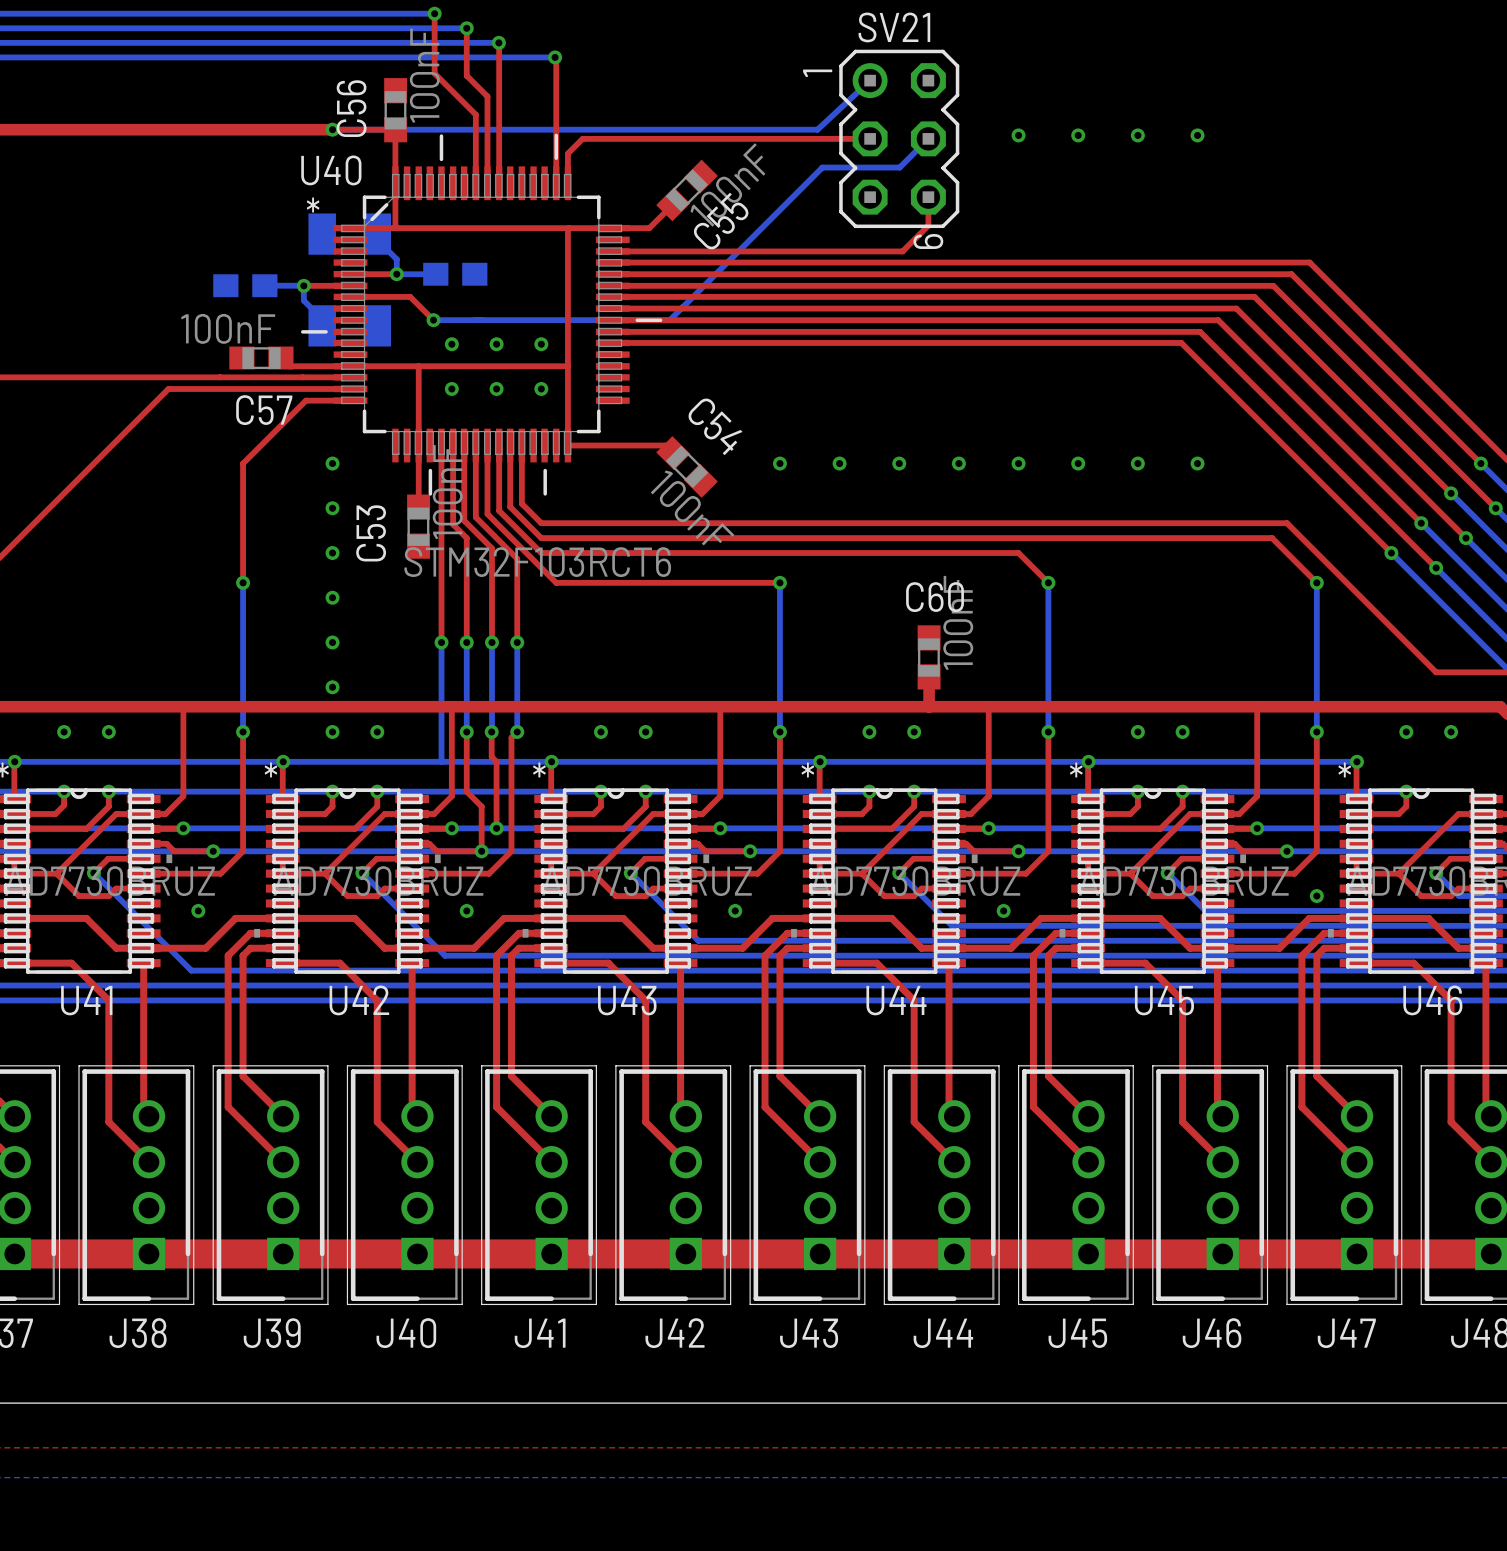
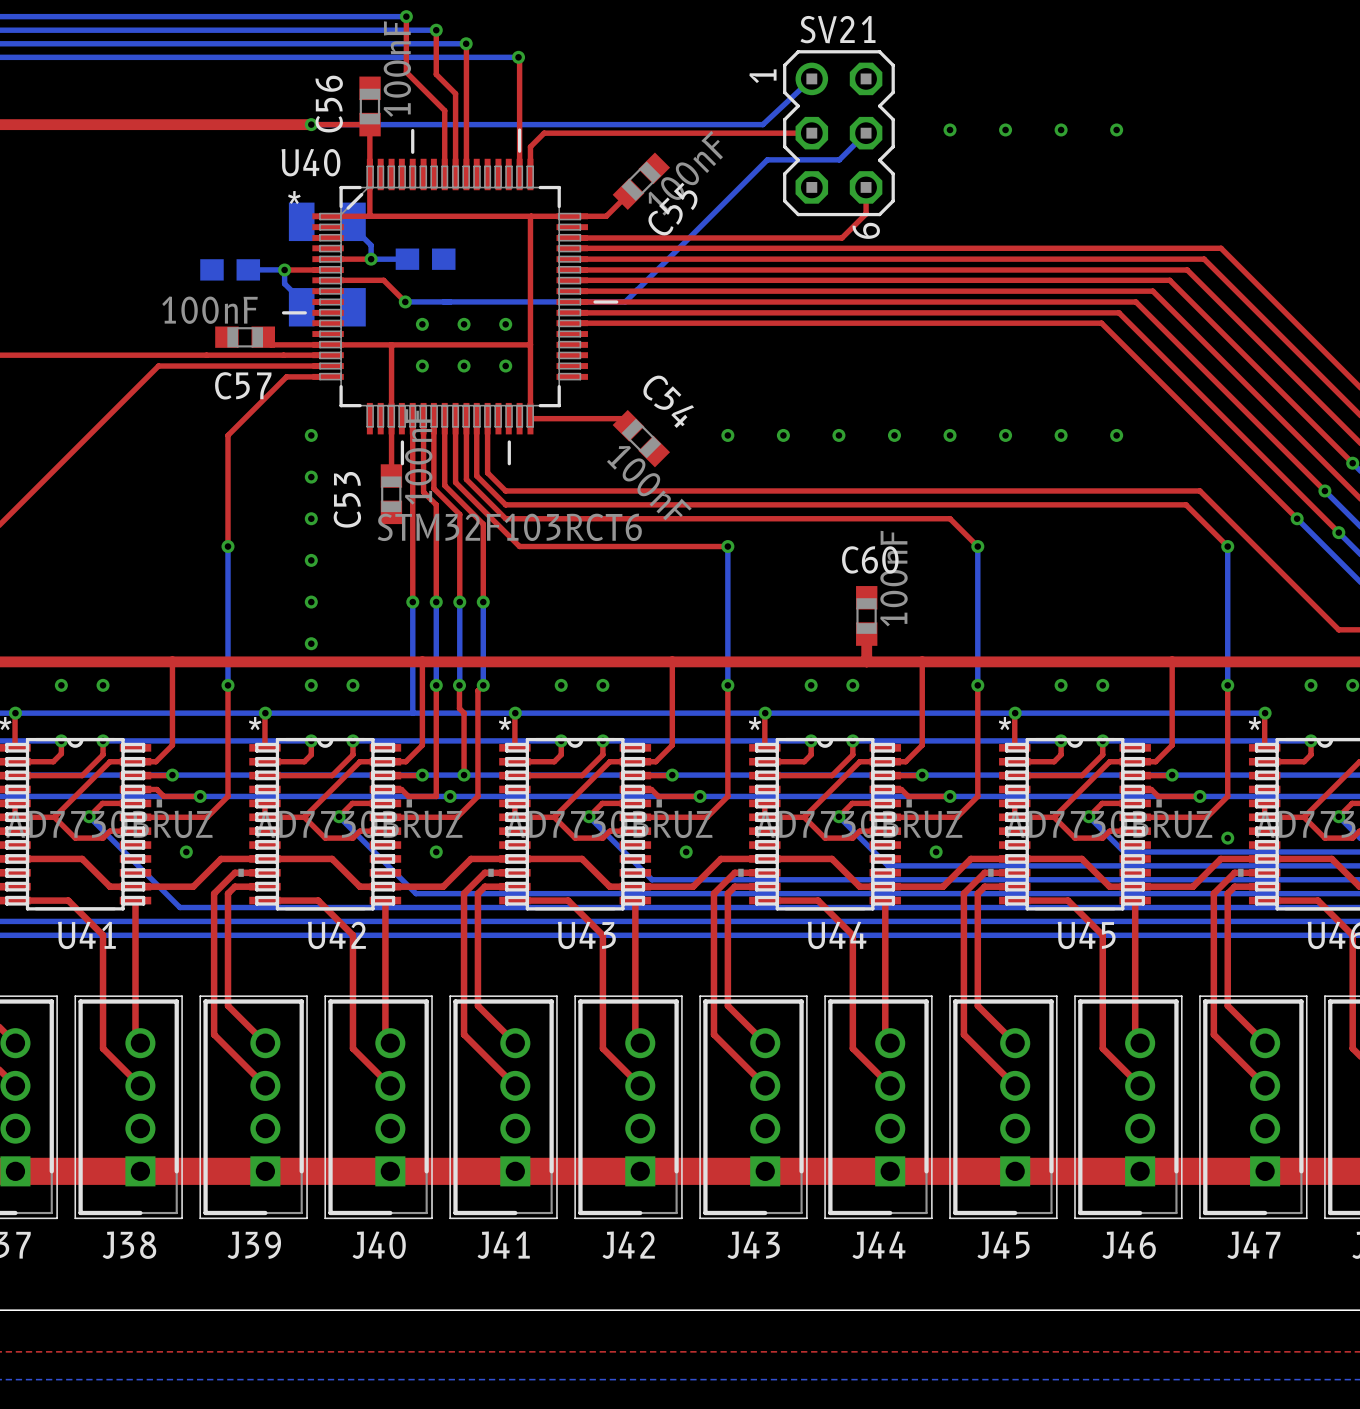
top track: (466, 791) (481, 806) (481, 851) (466, 851) -> (436, 740) (436, 796)

